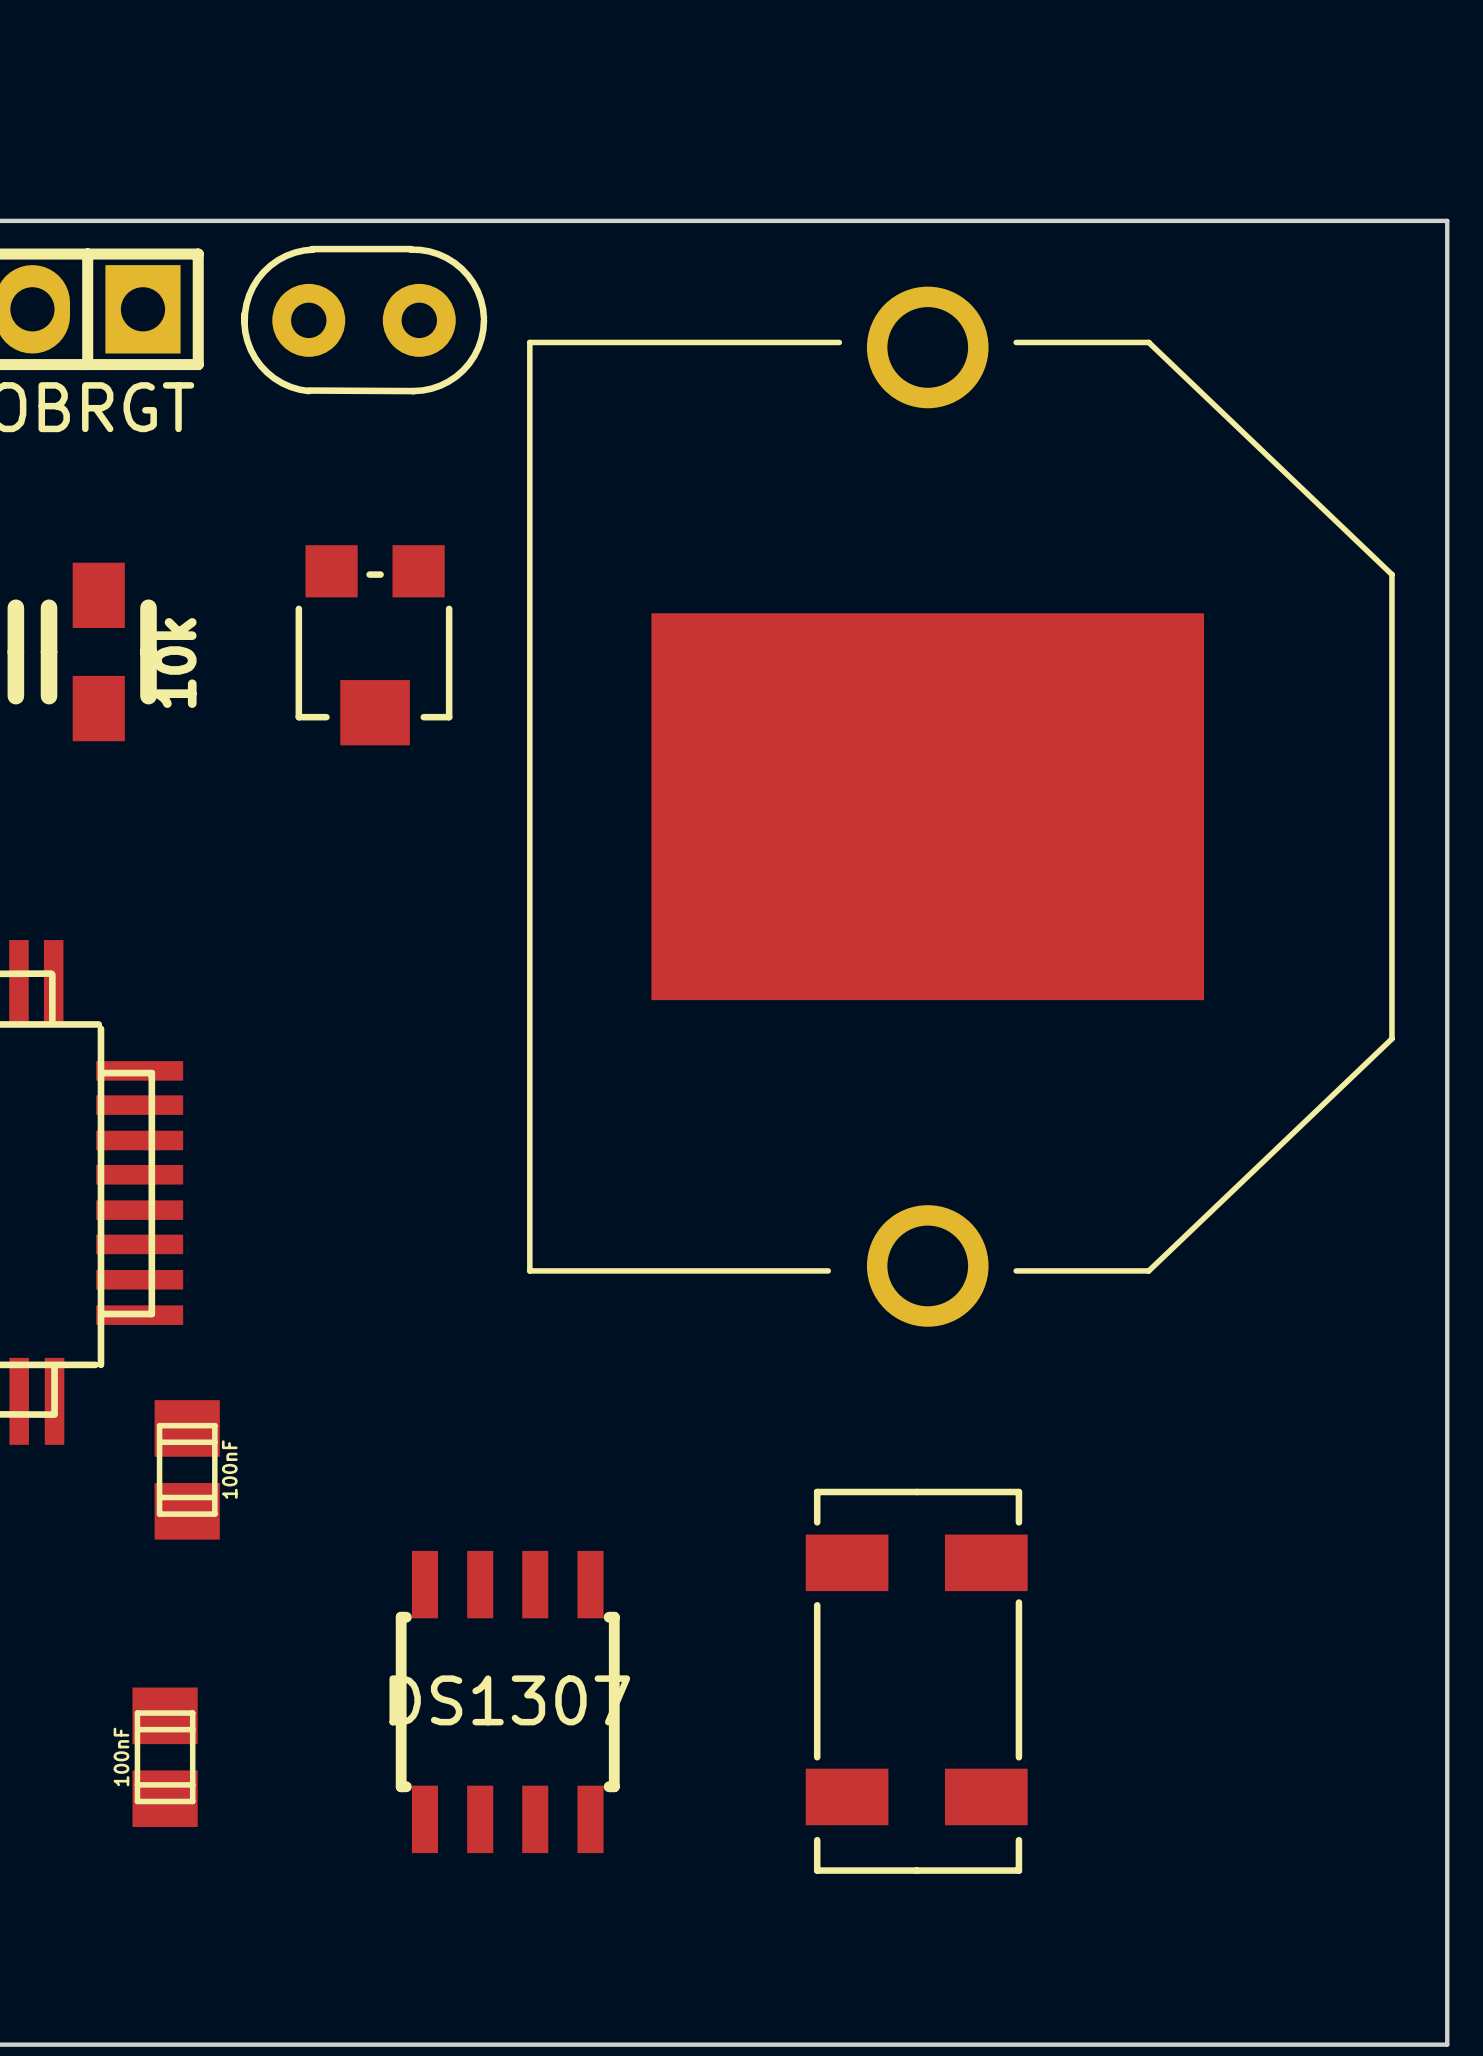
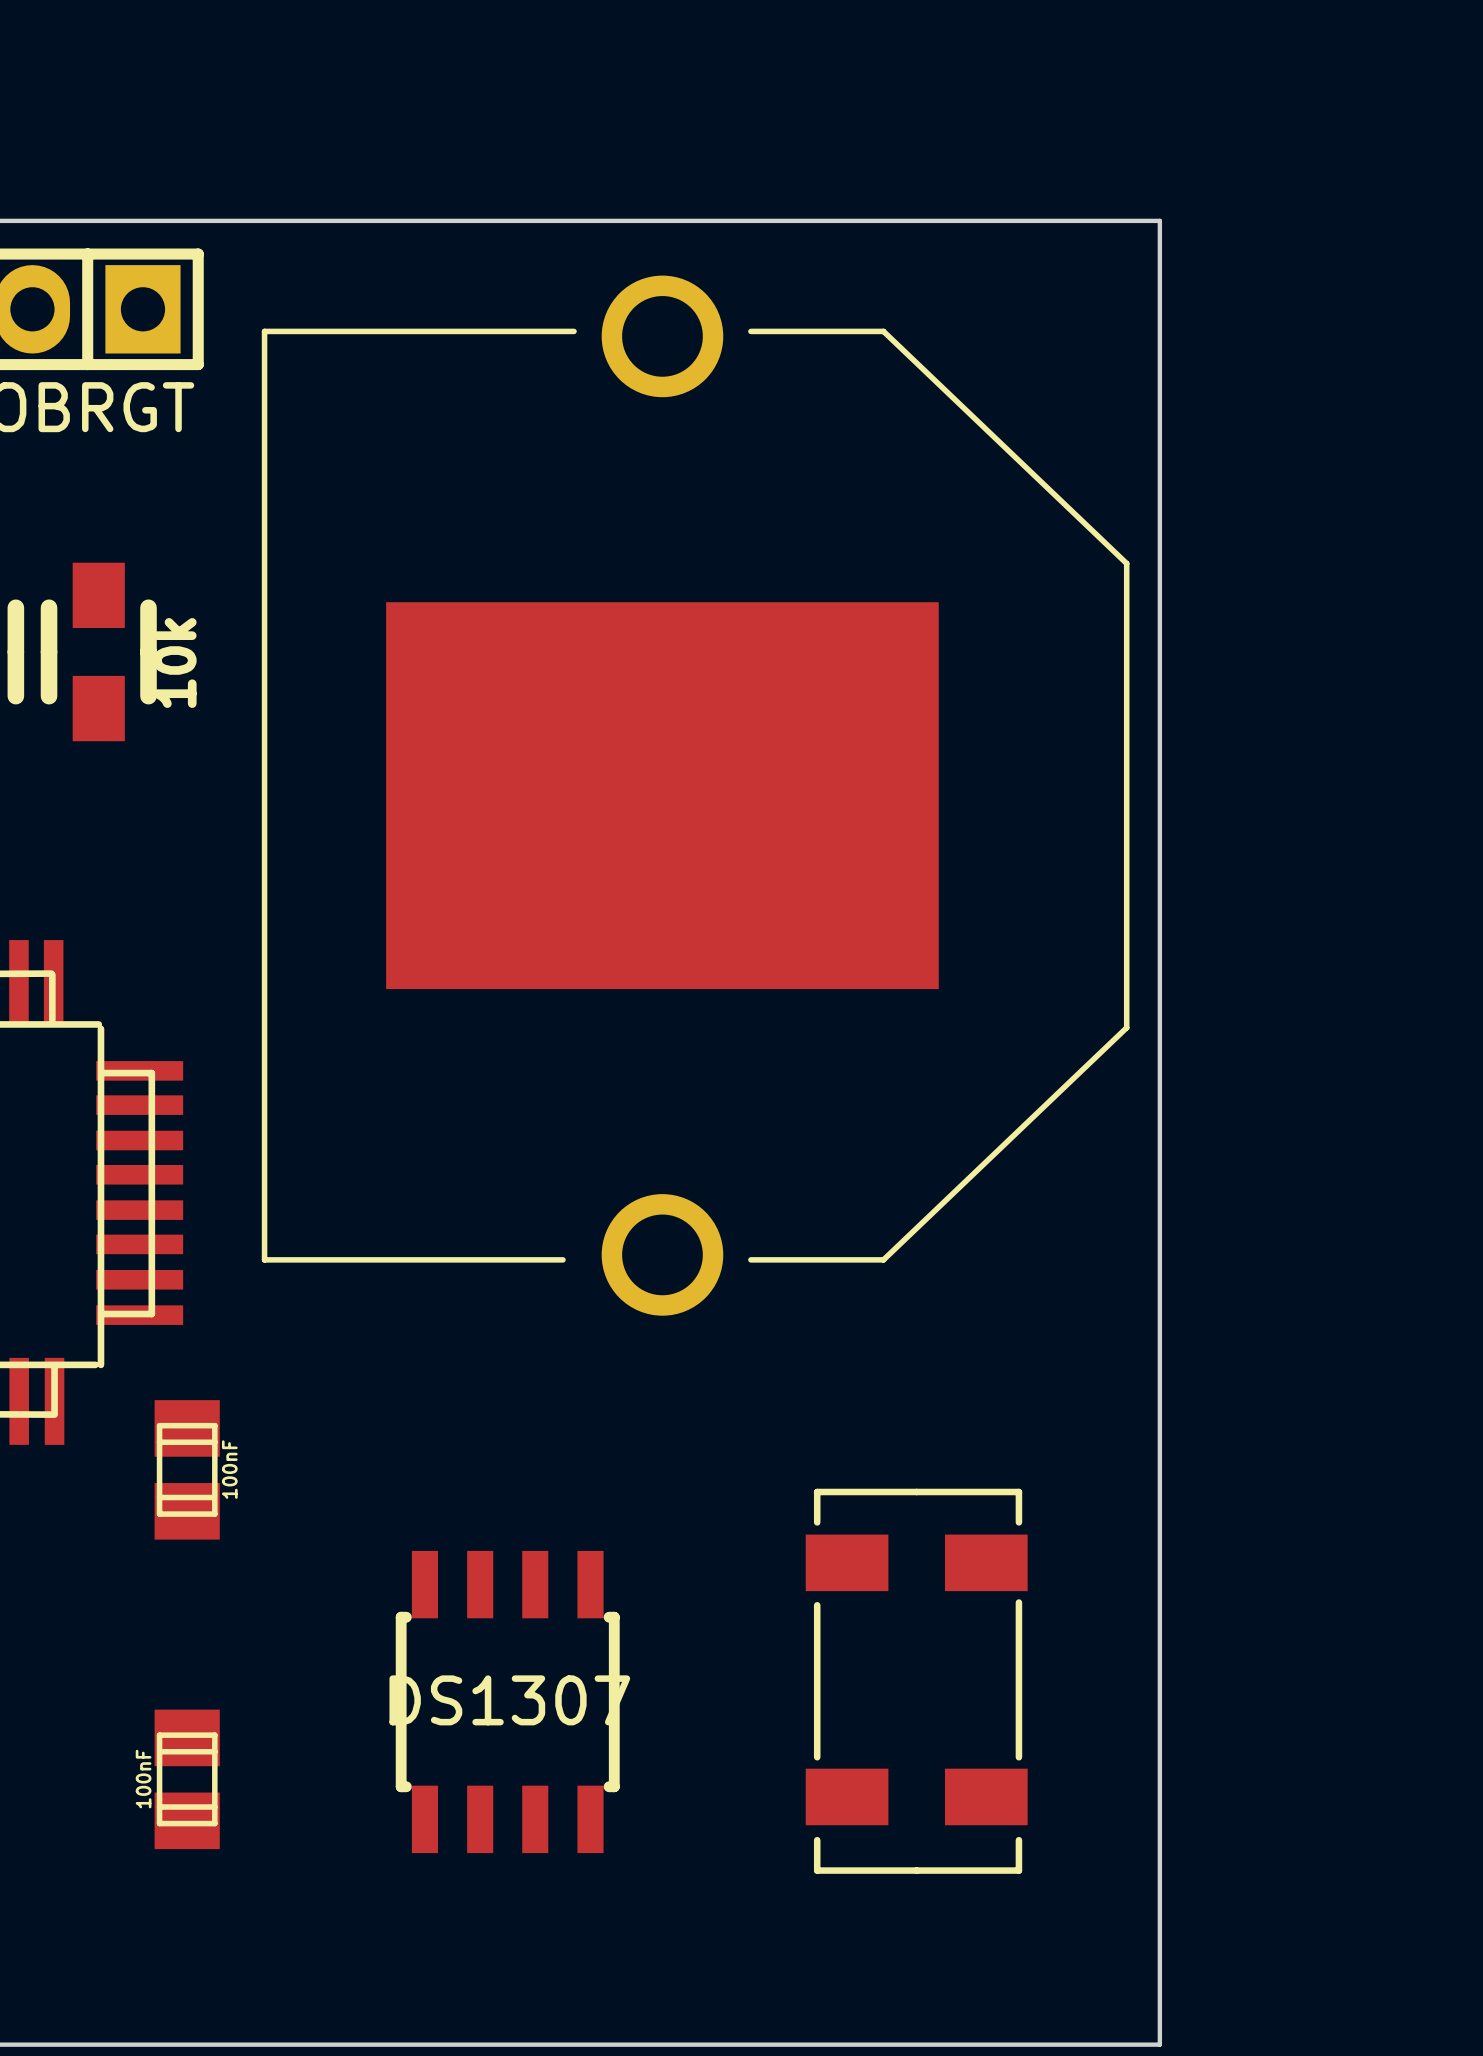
board edge: (1159, 220) (1447, 220) (1447, 2044) (1159, 2044) -> (1159, 220) (1159, 2044)
part: (364, 320) -> none
part: (373, 645) -> none
part position: (960, 806) -> (695, 795)
part position: (165, 1757) -> (187, 1779)

